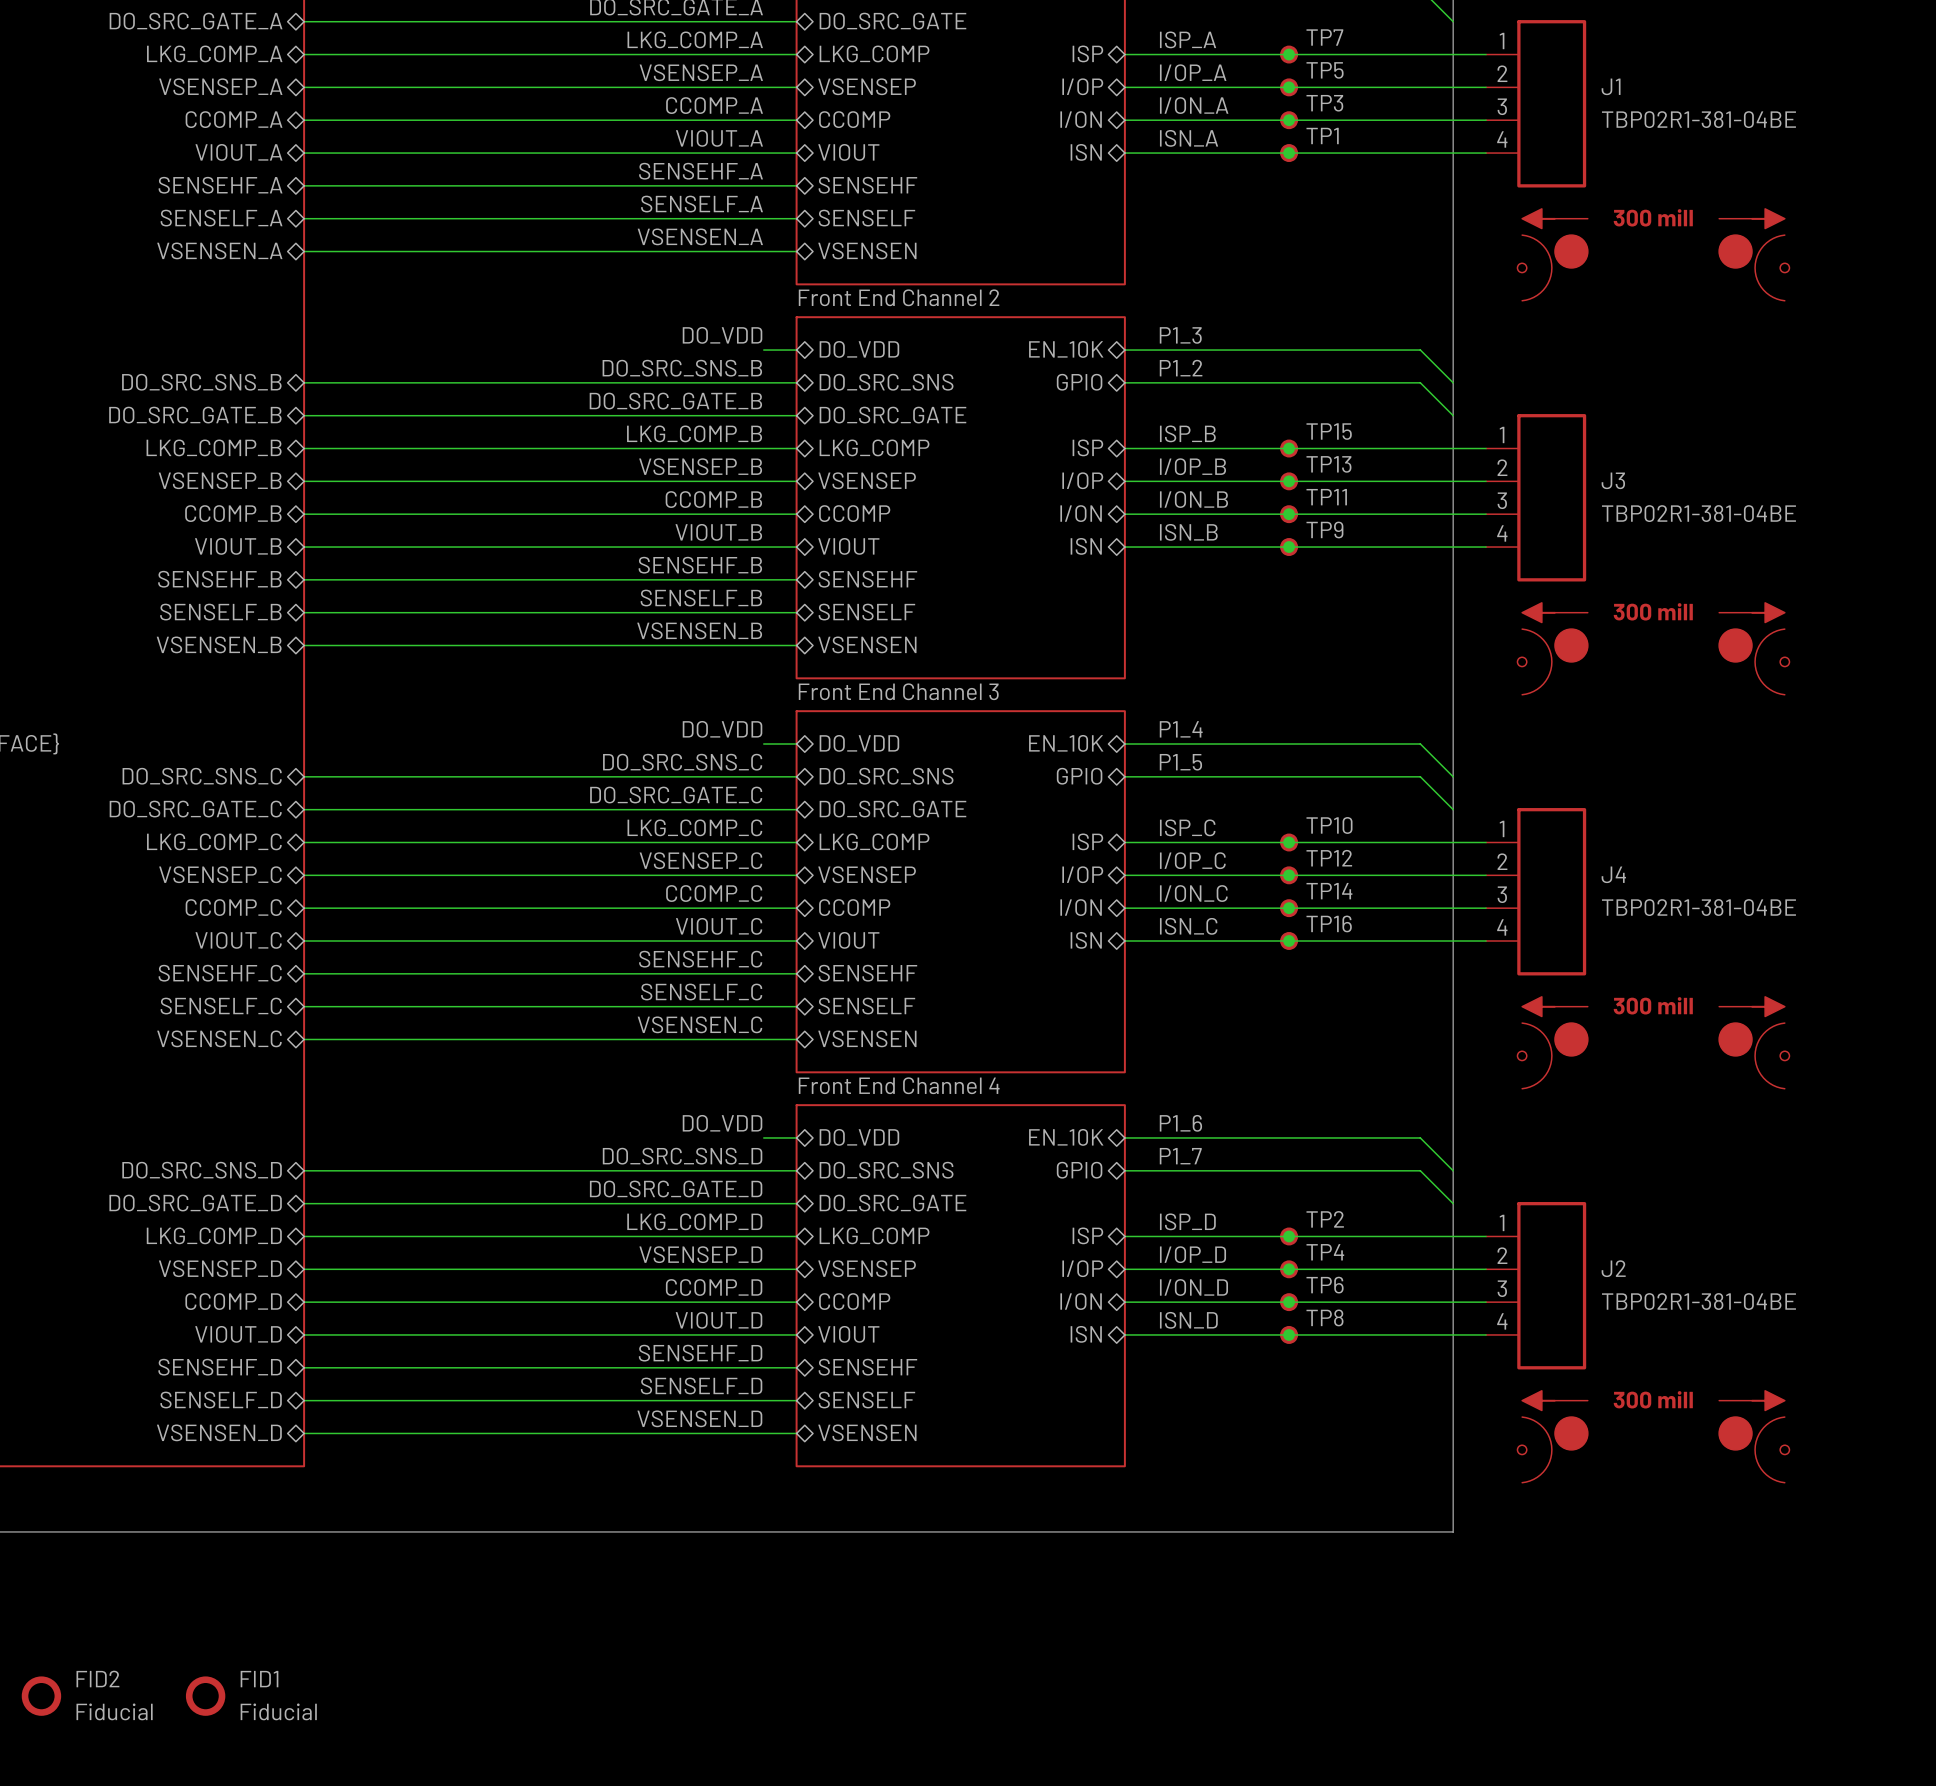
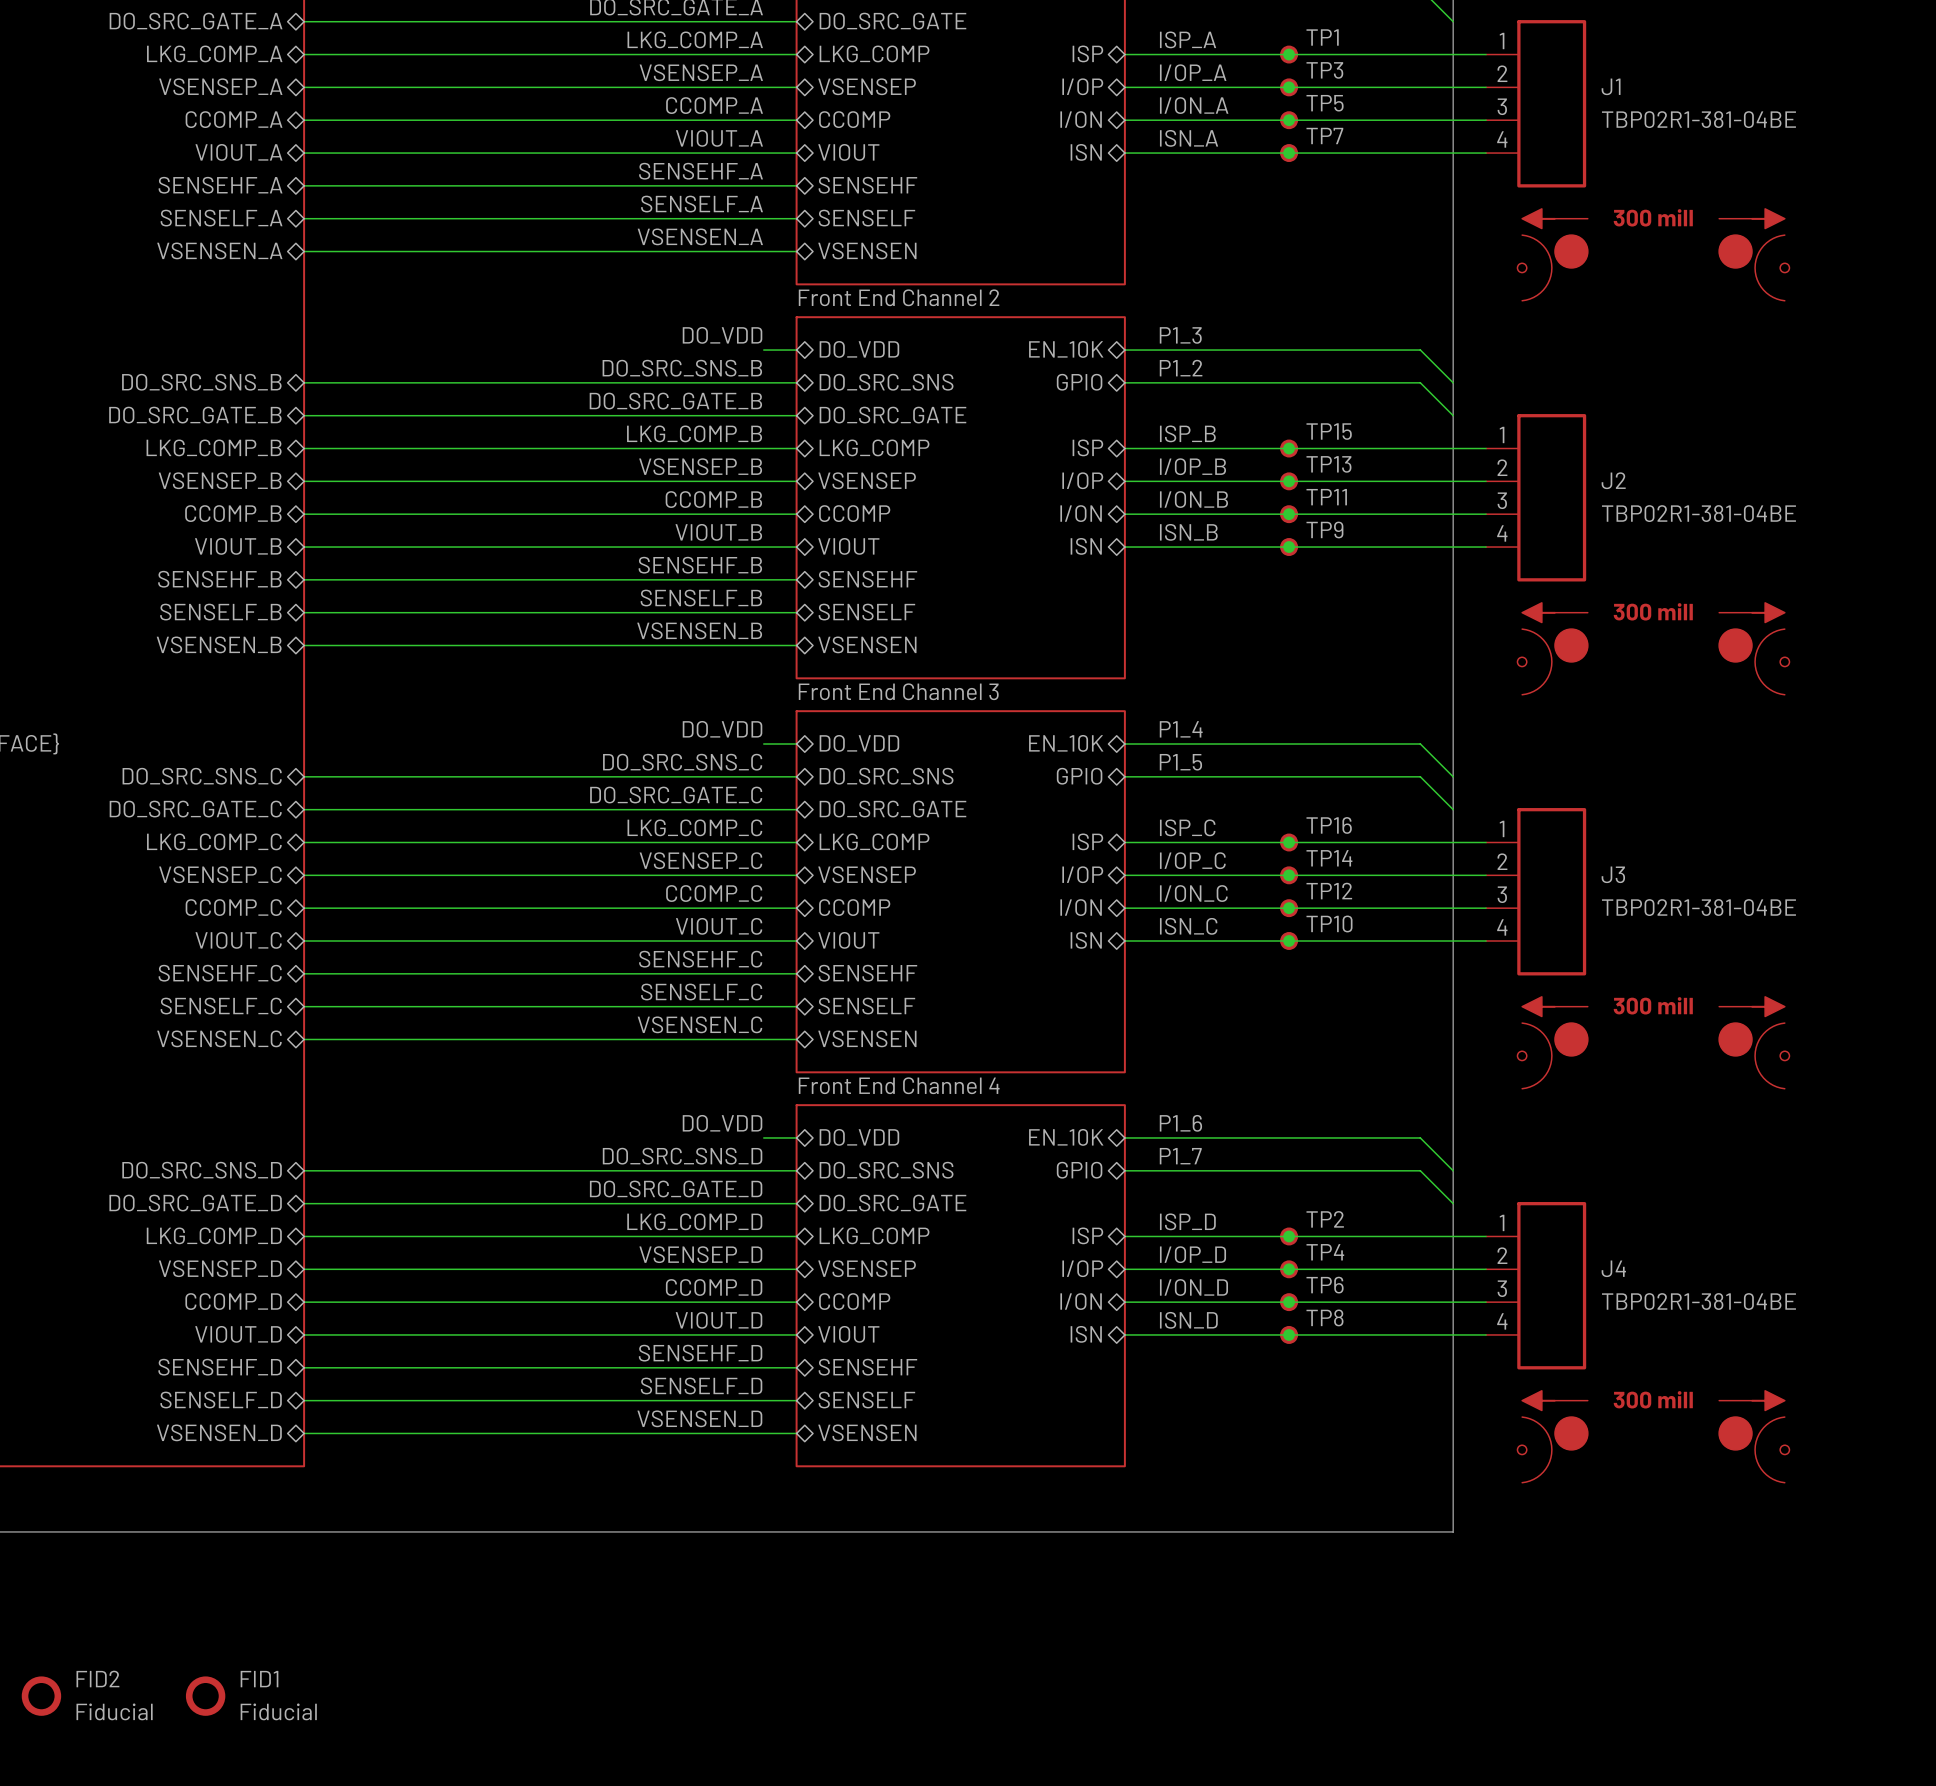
TP7 name: TP7 (1324, 37) -> TP1 (1322, 37)
TP5 name: TP5 (1325, 70) -> TP3 (1324, 70)
TP3 name: TP3 (1324, 103) -> TP5 (1325, 103)
TP1 name: TP1 (1322, 135) -> TP7 (1324, 135)
J3 name: J3 (1613, 480) -> J2 (1613, 480)
TP10 name: TP10 (1329, 825) -> TP16 (1329, 825)
TP12 name: TP12 (1329, 858) -> TP14 (1329, 858)
J4 name: J4 (1613, 874) -> J3 (1613, 874)
TP14 name: TP14 (1329, 891) -> TP12 (1329, 891)
TP16 name: TP16 (1329, 923) -> TP10 (1329, 923)
J2 name: J2 (1613, 1268) -> J4 (1613, 1268)

